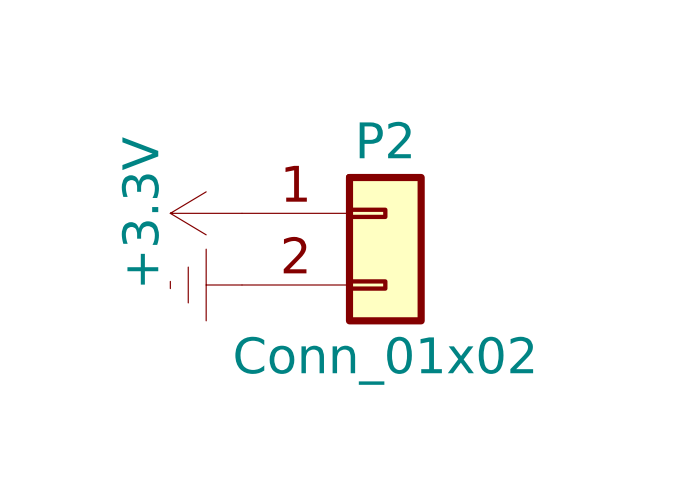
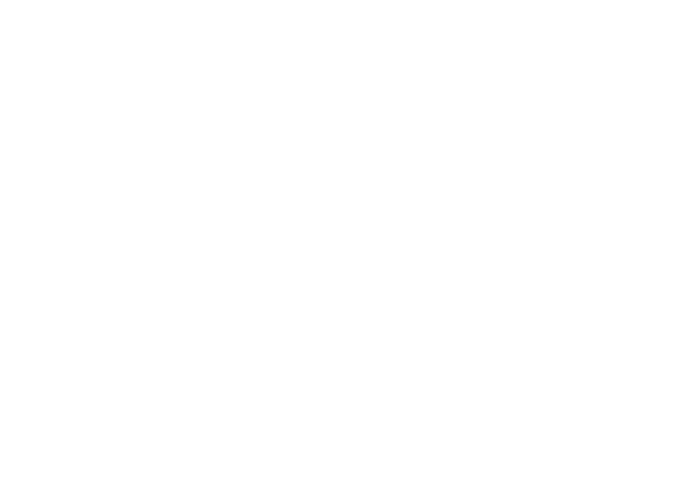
power symbol: +3.3V (206, 213) -> none
P2: Conn_01x02 (333, 249) -> none
power symbol: (206, 285) -> none

